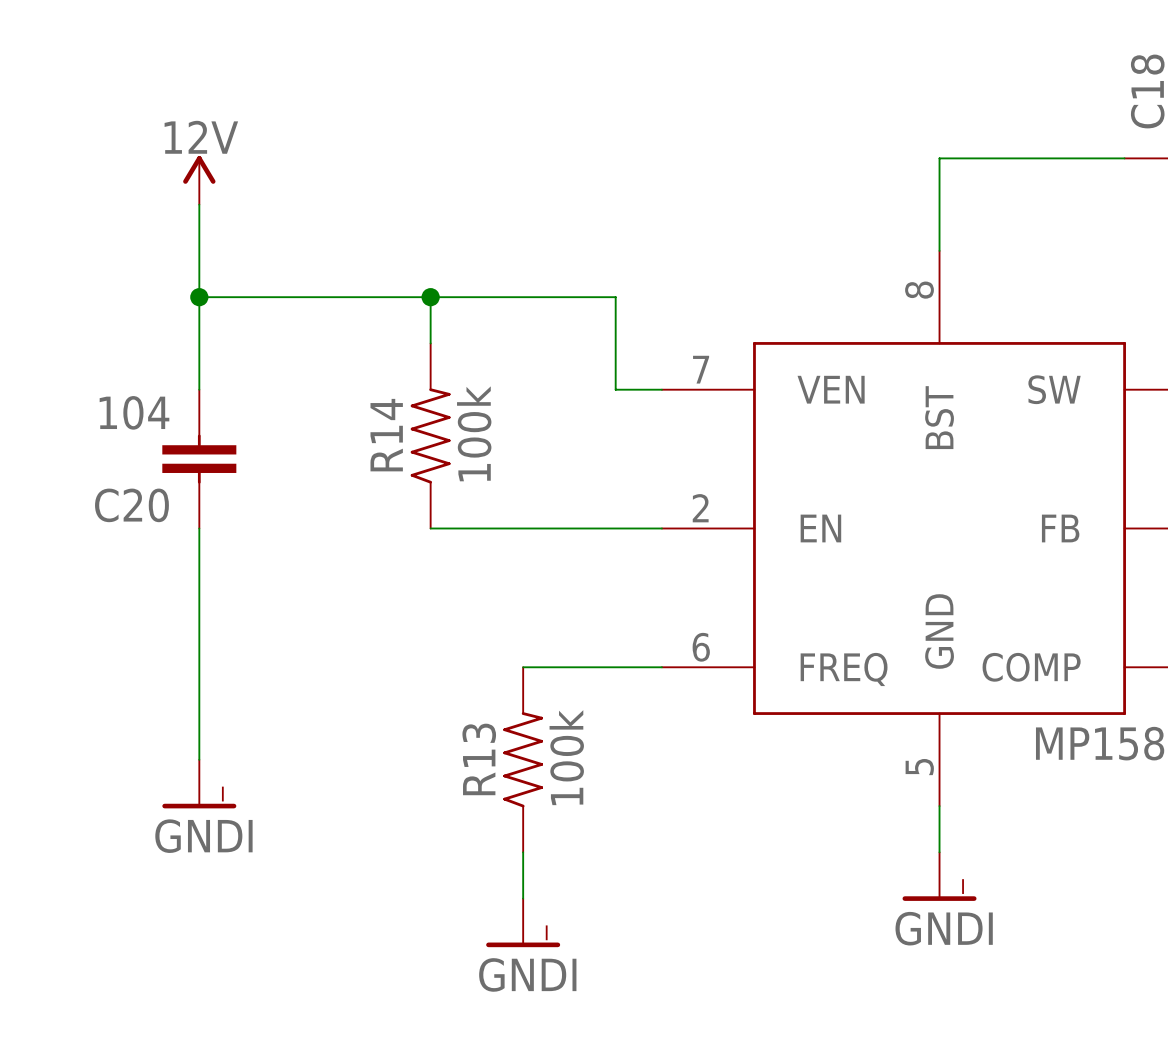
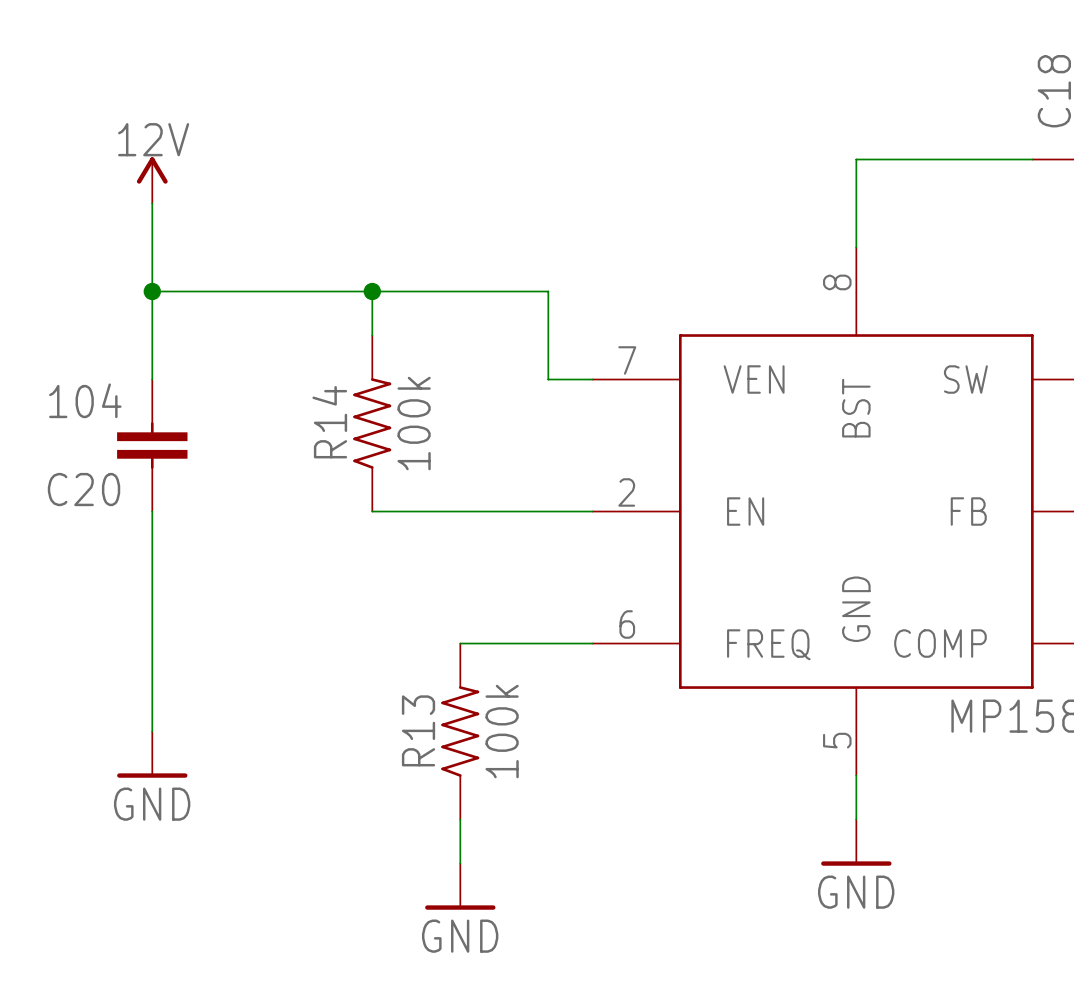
power symbol: GNDI (199, 784) -> GND (152, 754)
power symbol: GNDI (939, 876) -> GND (856, 842)
power symbol: GNDI (523, 922) -> GND (460, 886)

